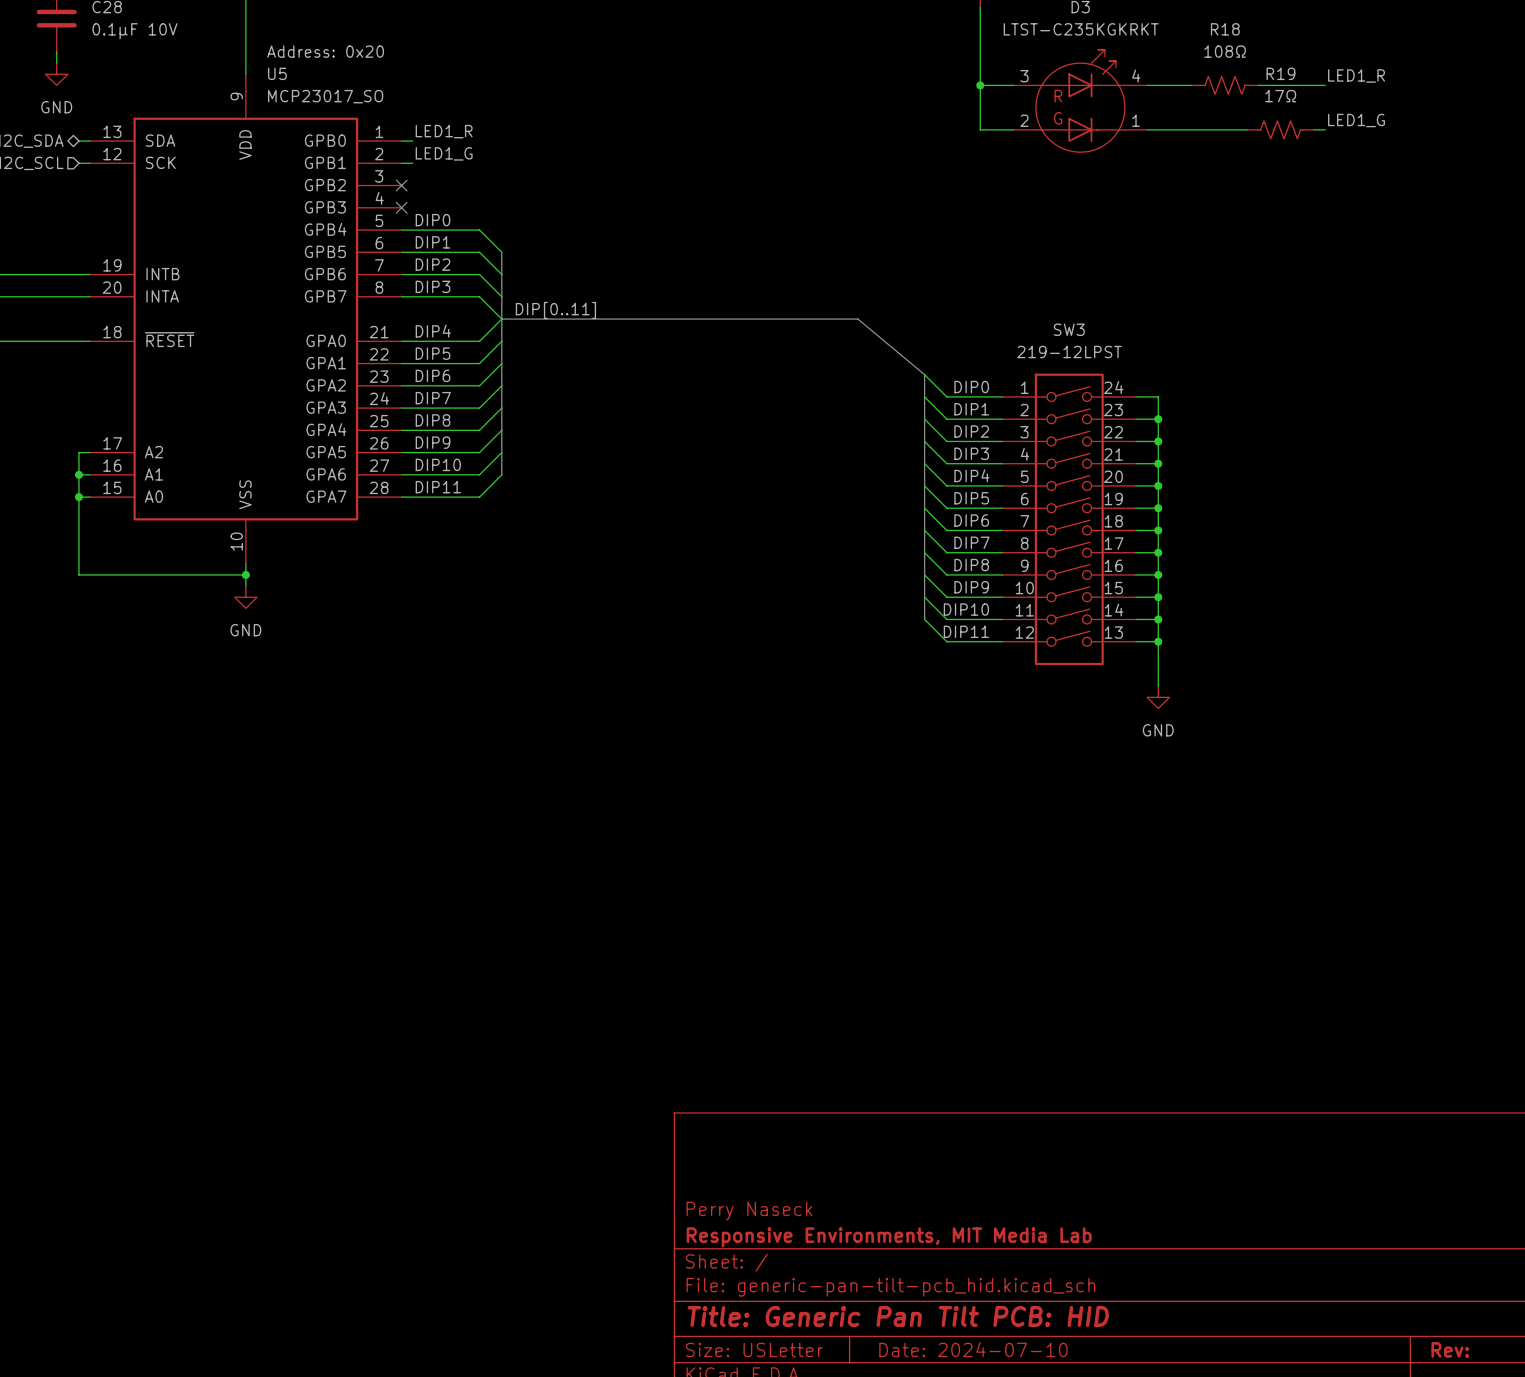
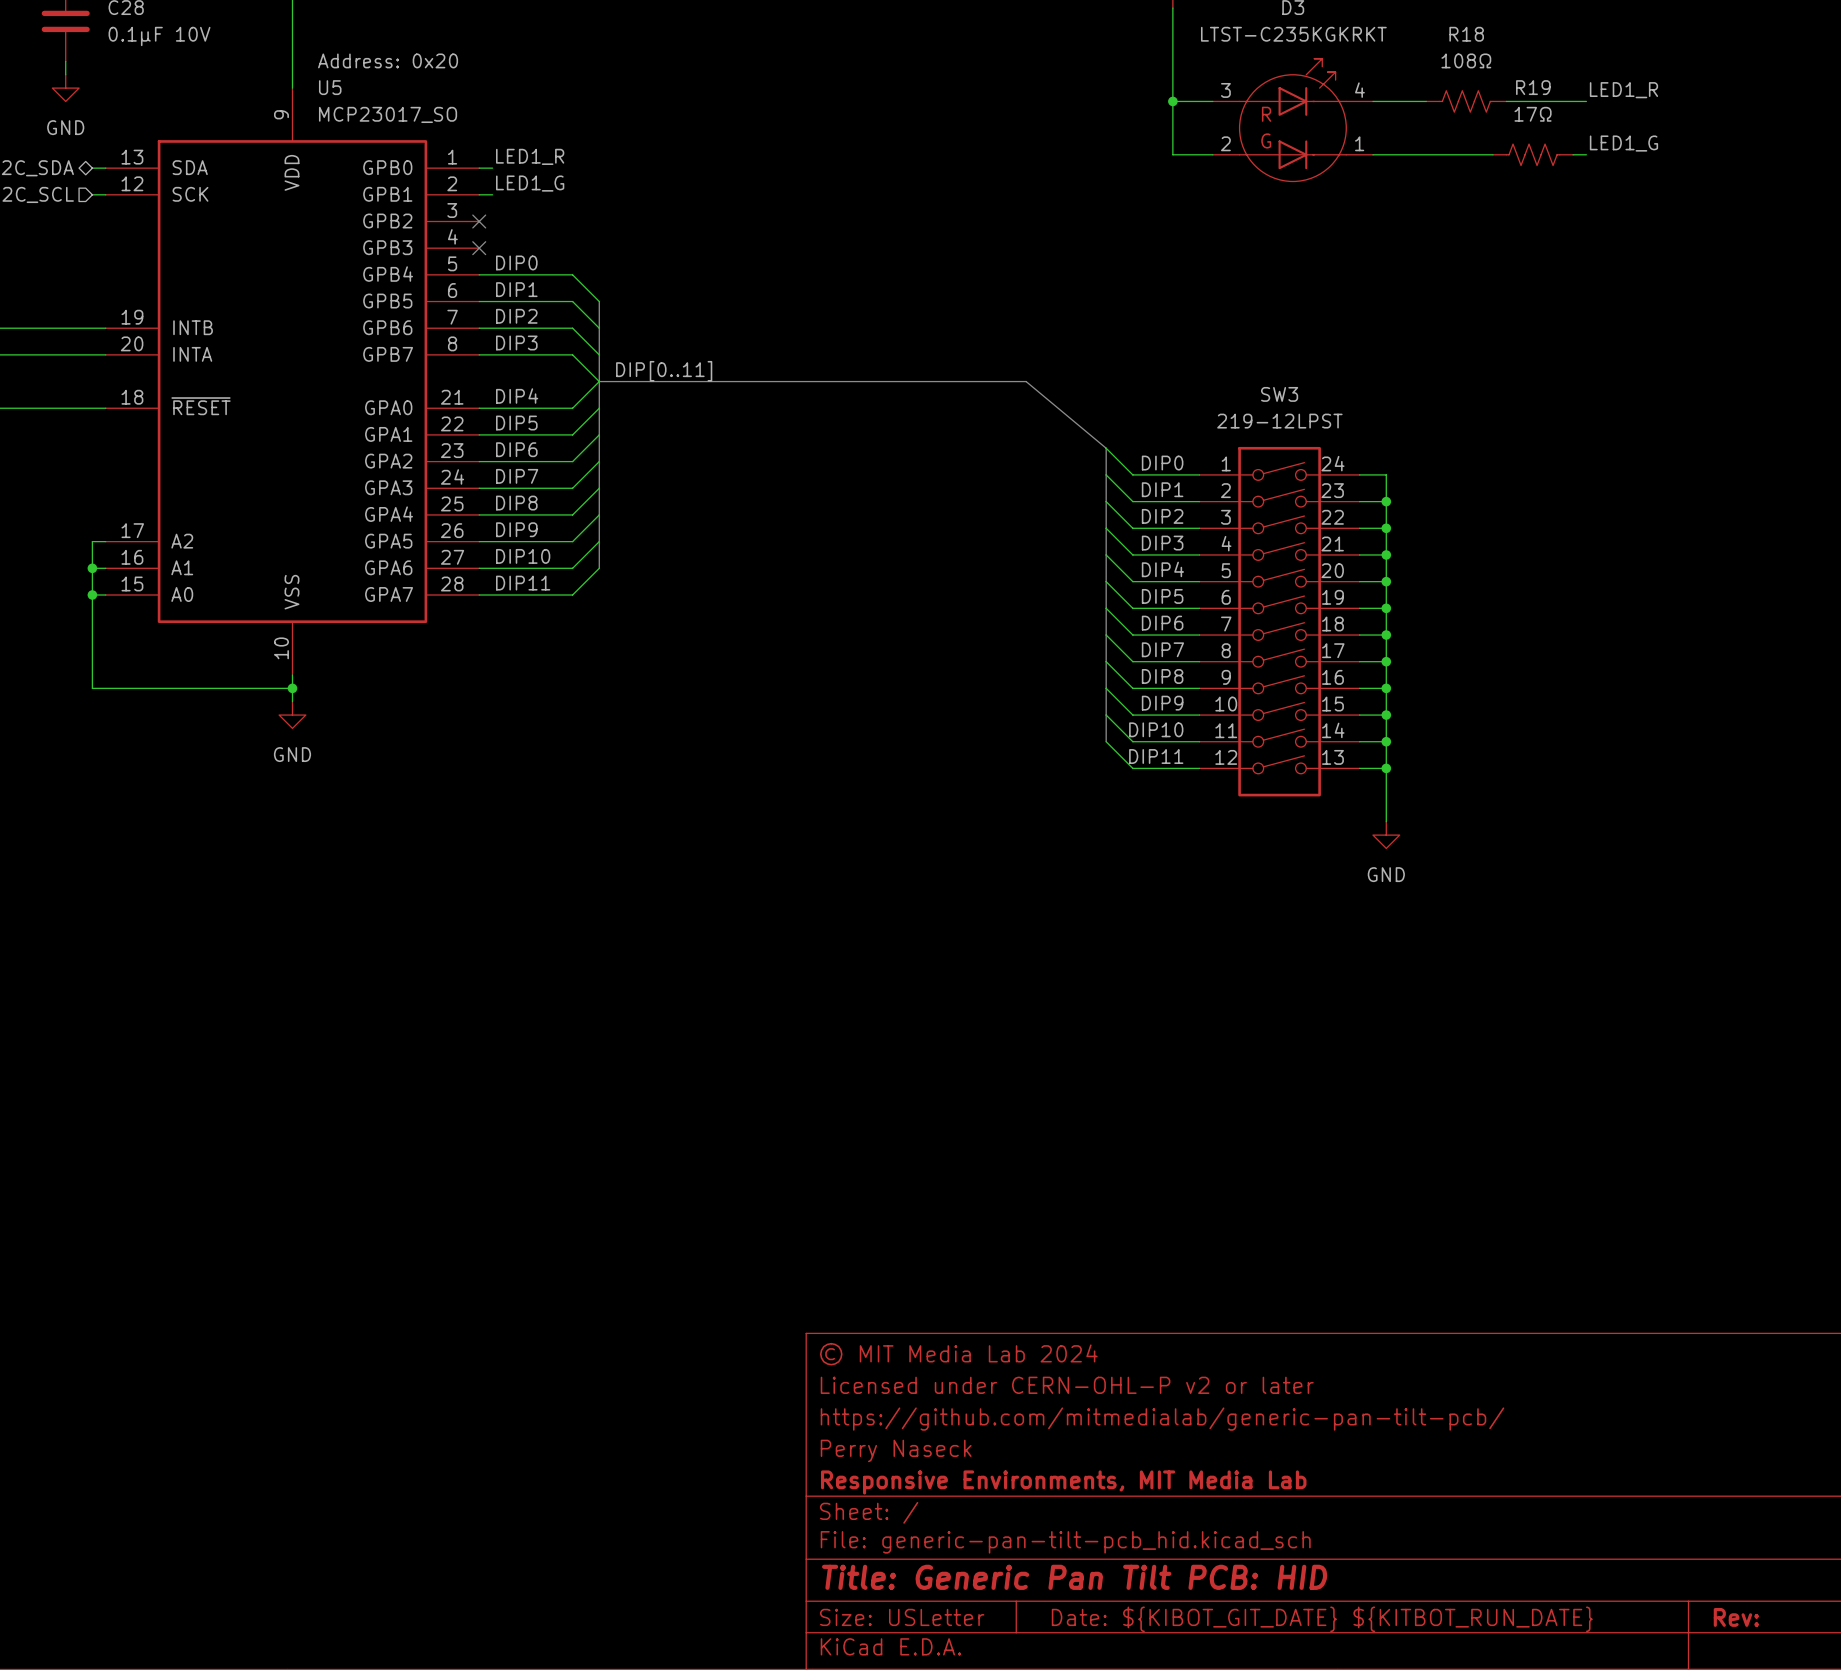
title block: none -> © MIT Media Lab 2024 (958, 1354)
title block: none -> Licensed under CERN-OHL-P v2 or later (1067, 1385)
title block: none -> https://github.com/mitmedialab/generic-pan-tilt-pcb/ (1162, 1419)
title block: Date: 2024-07-10 (973, 1349) -> Date: ${KIBOT_GIT_DATE} ${KITBOT_RUN_DATE} (1322, 1619)

